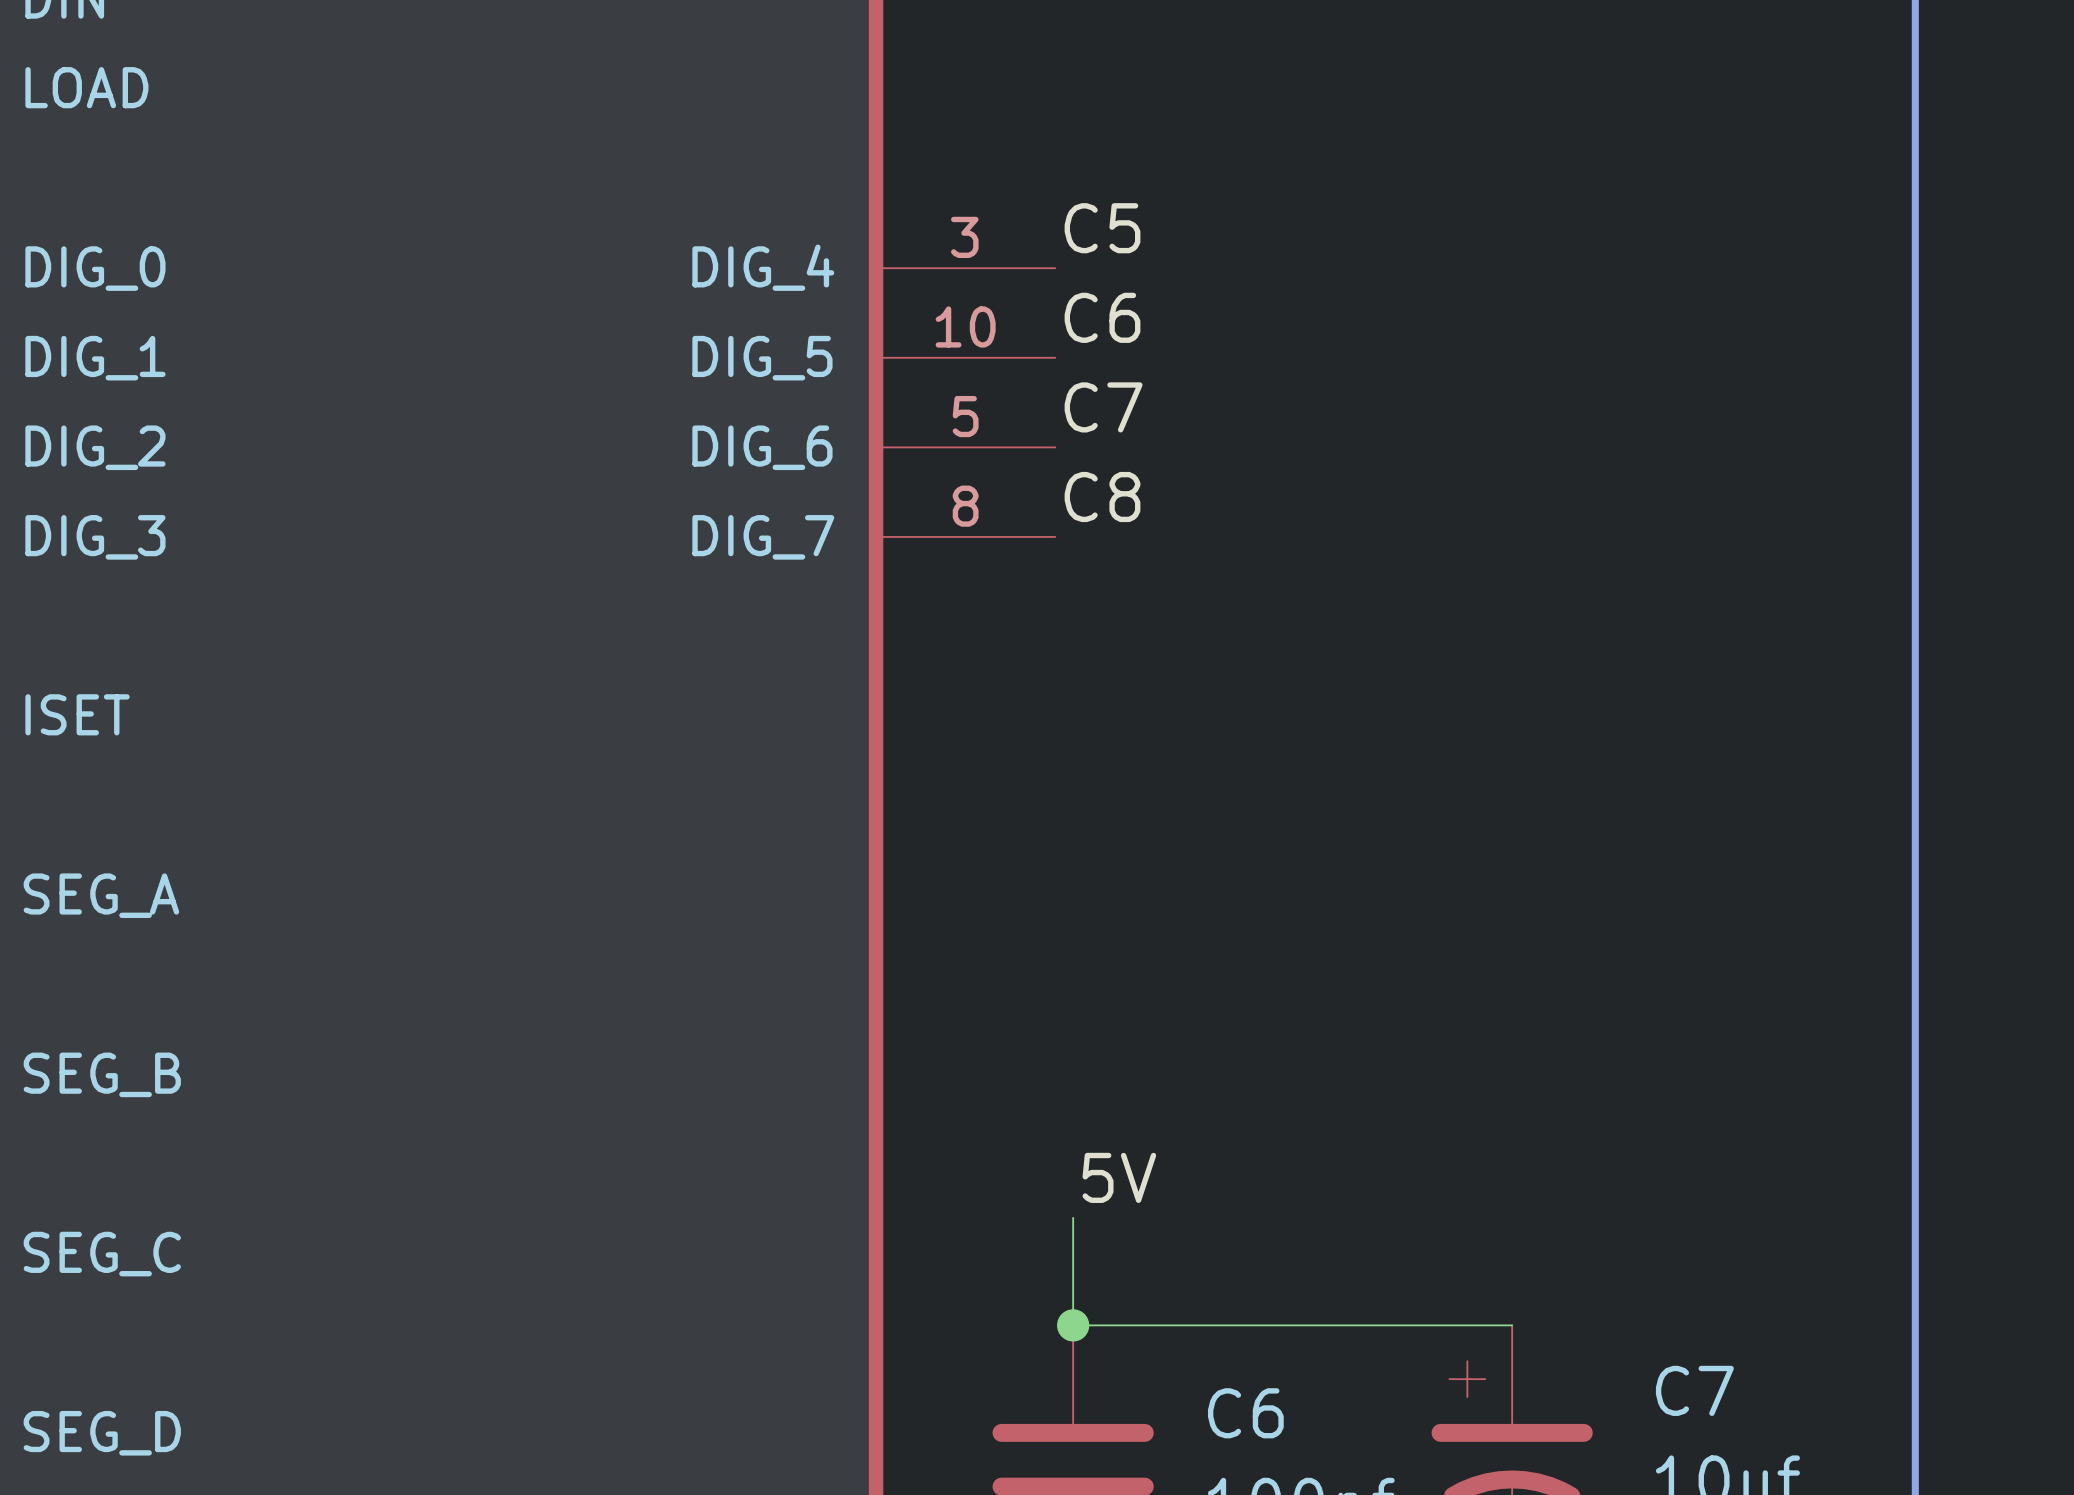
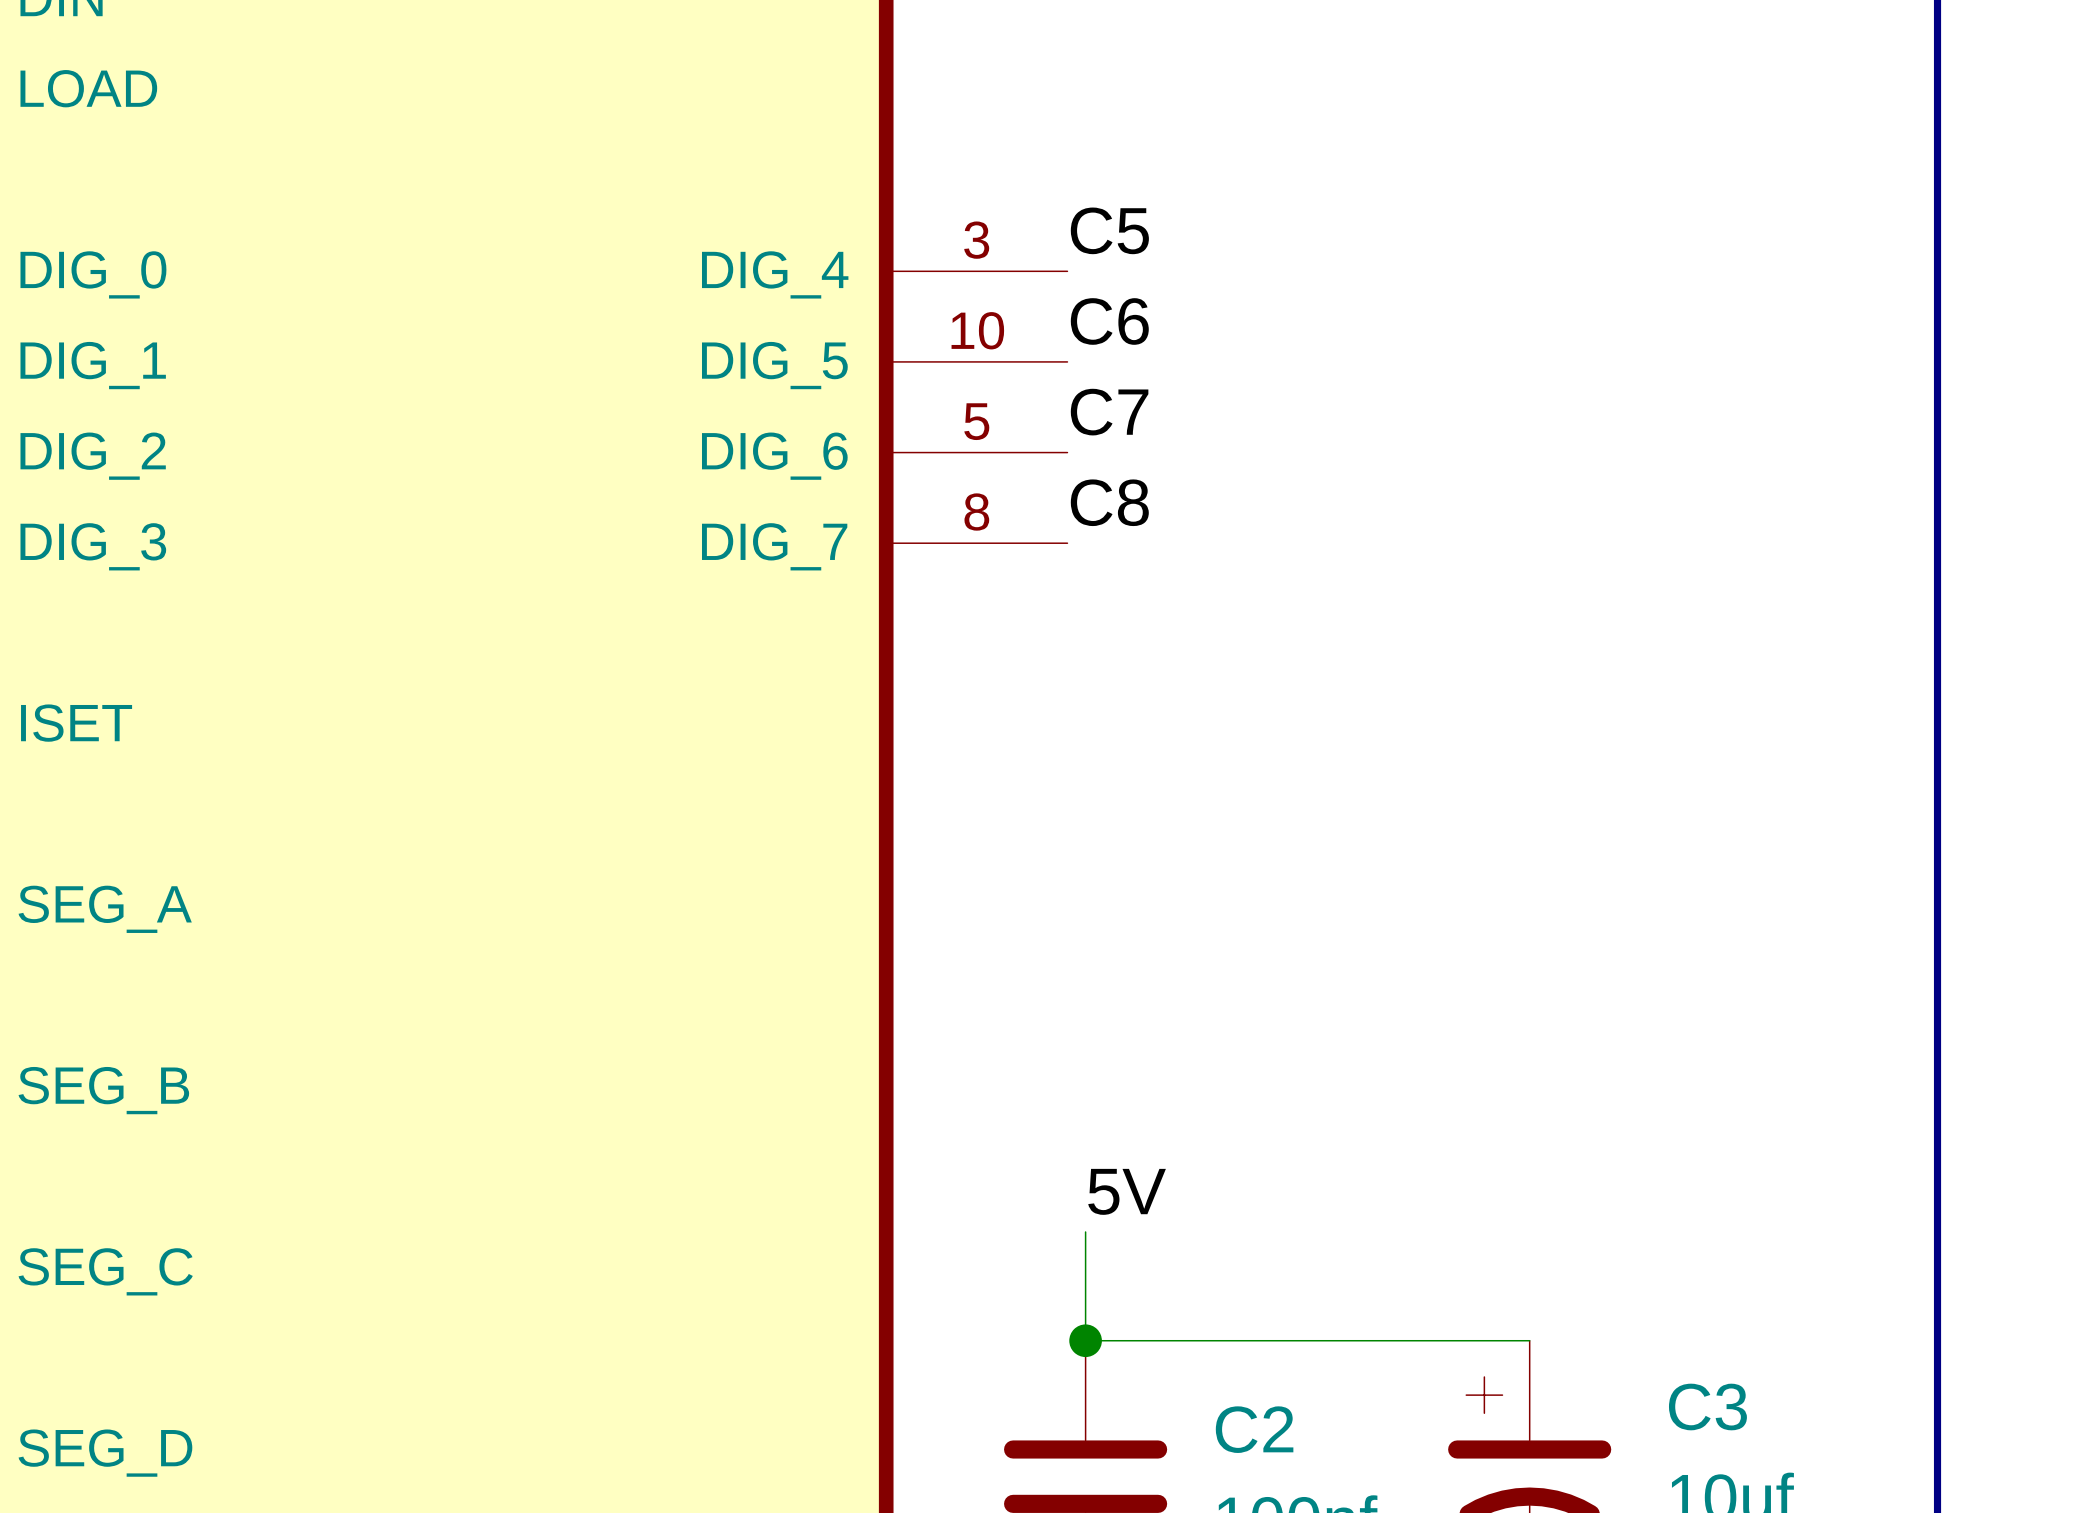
C7 name: C7 (1694, 1390) -> C3 (1707, 1407)
C6 name: C6 (1245, 1413) -> C2 (1254, 1429)

